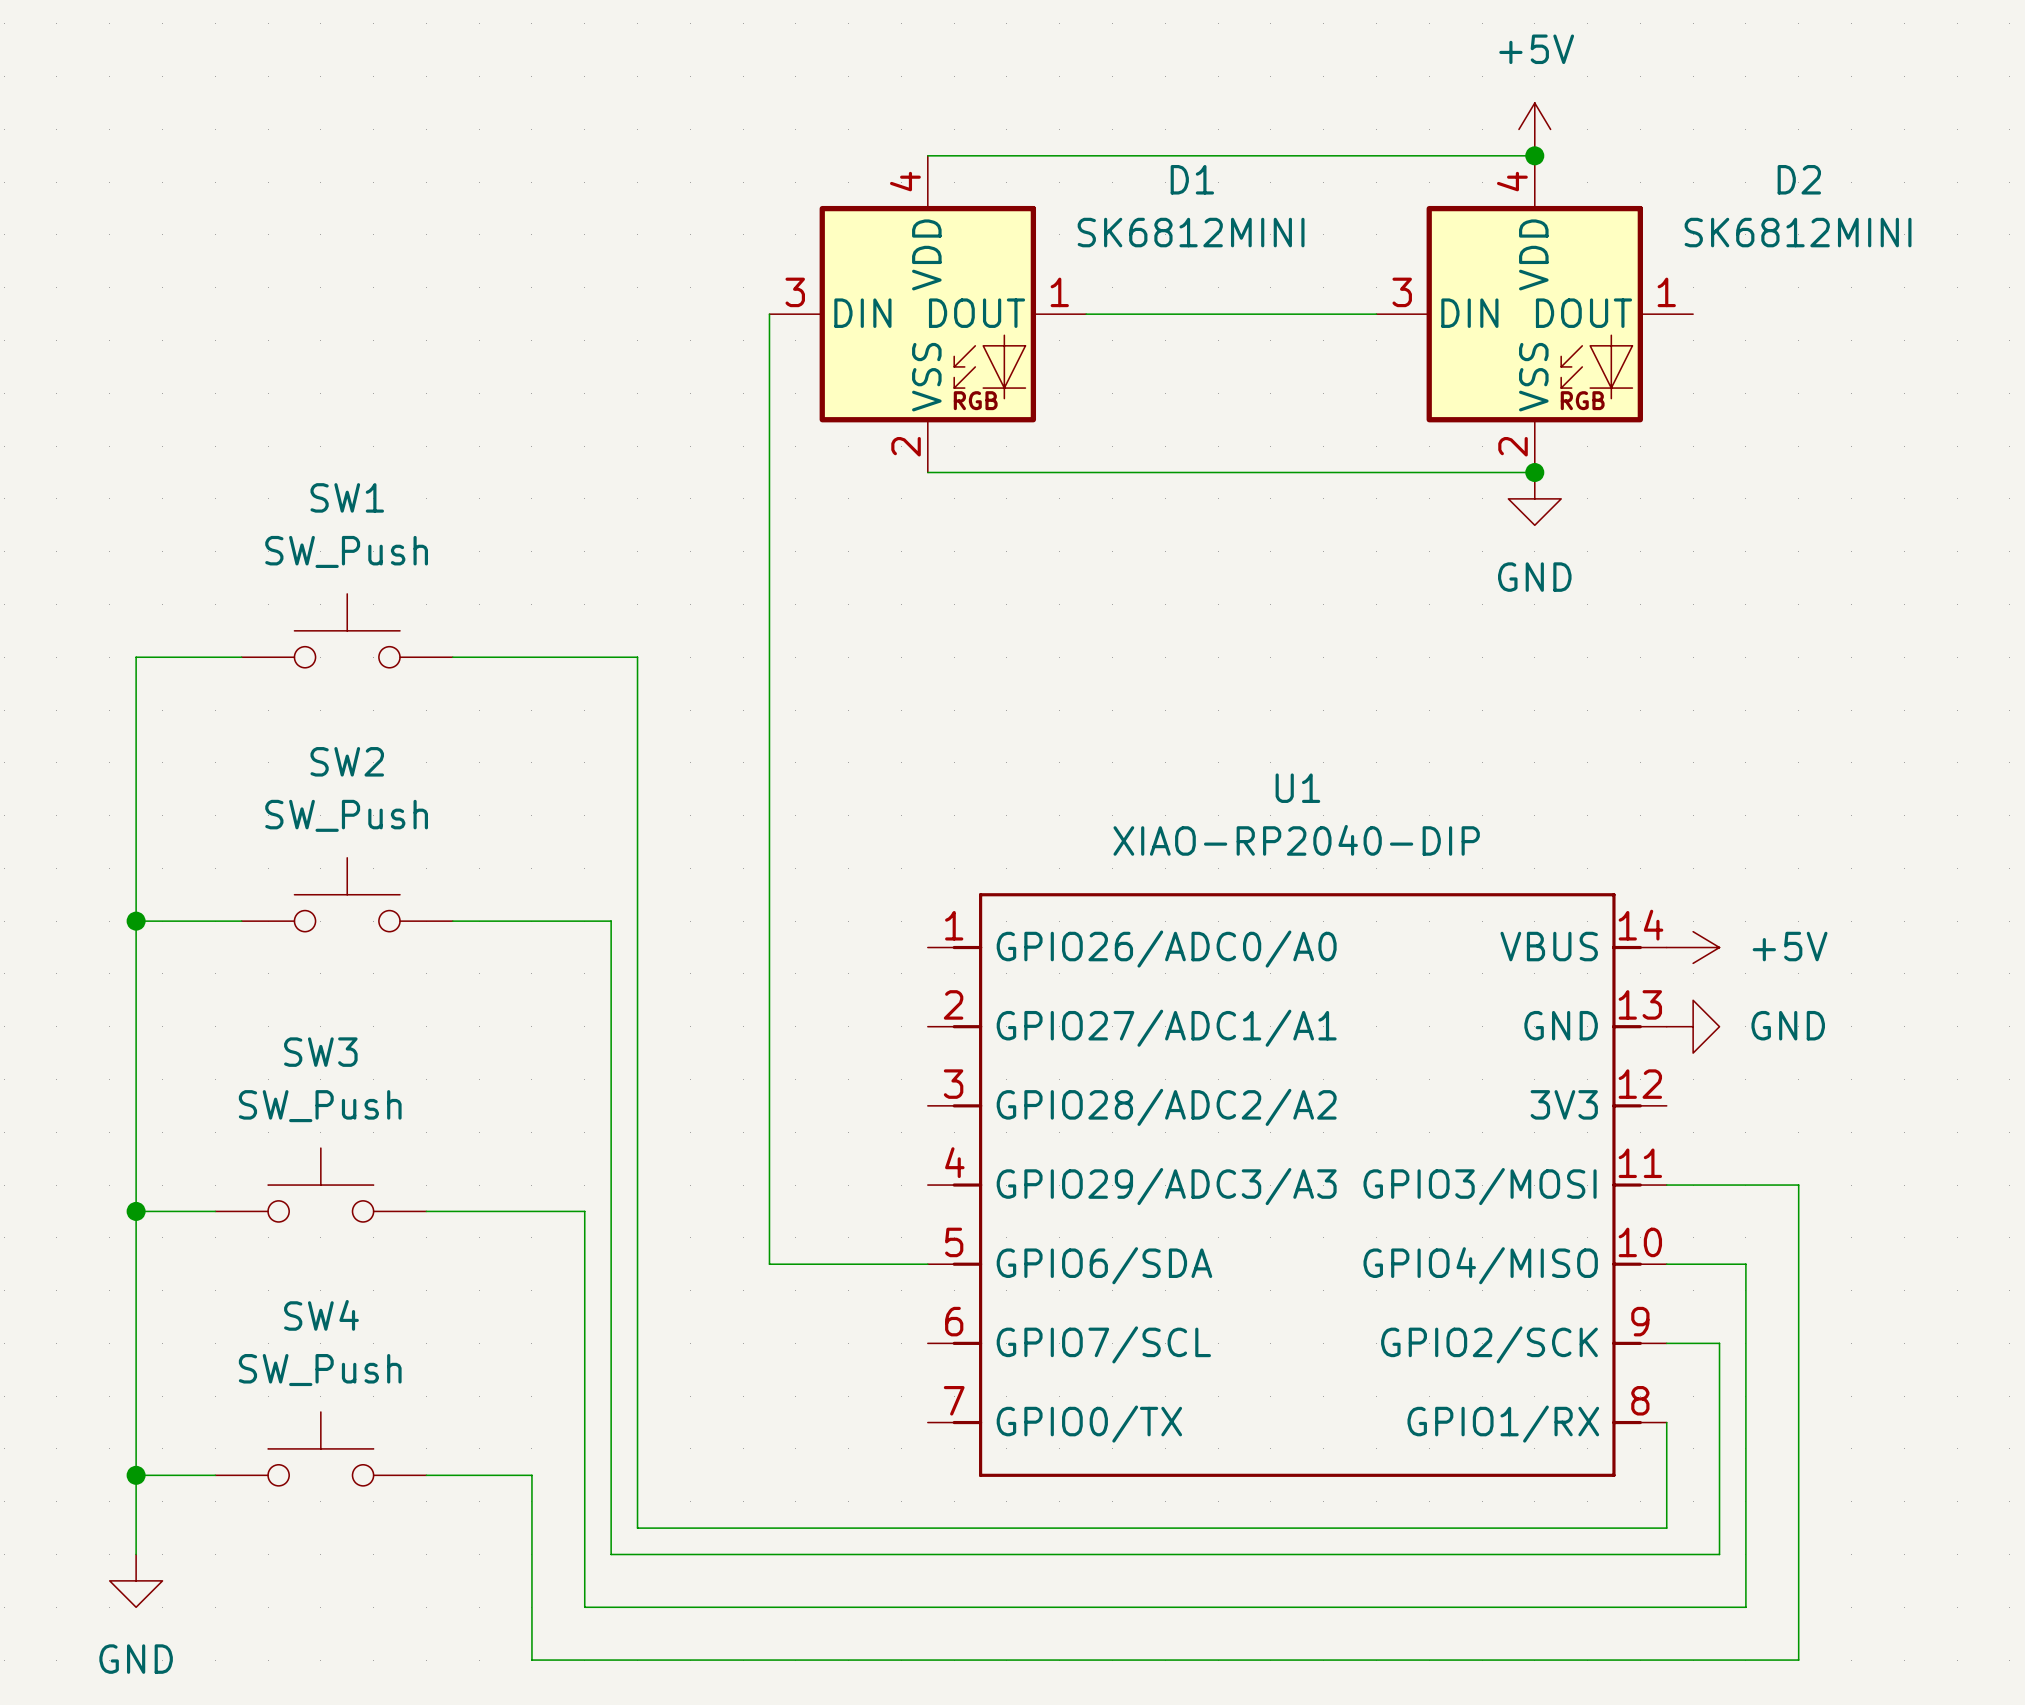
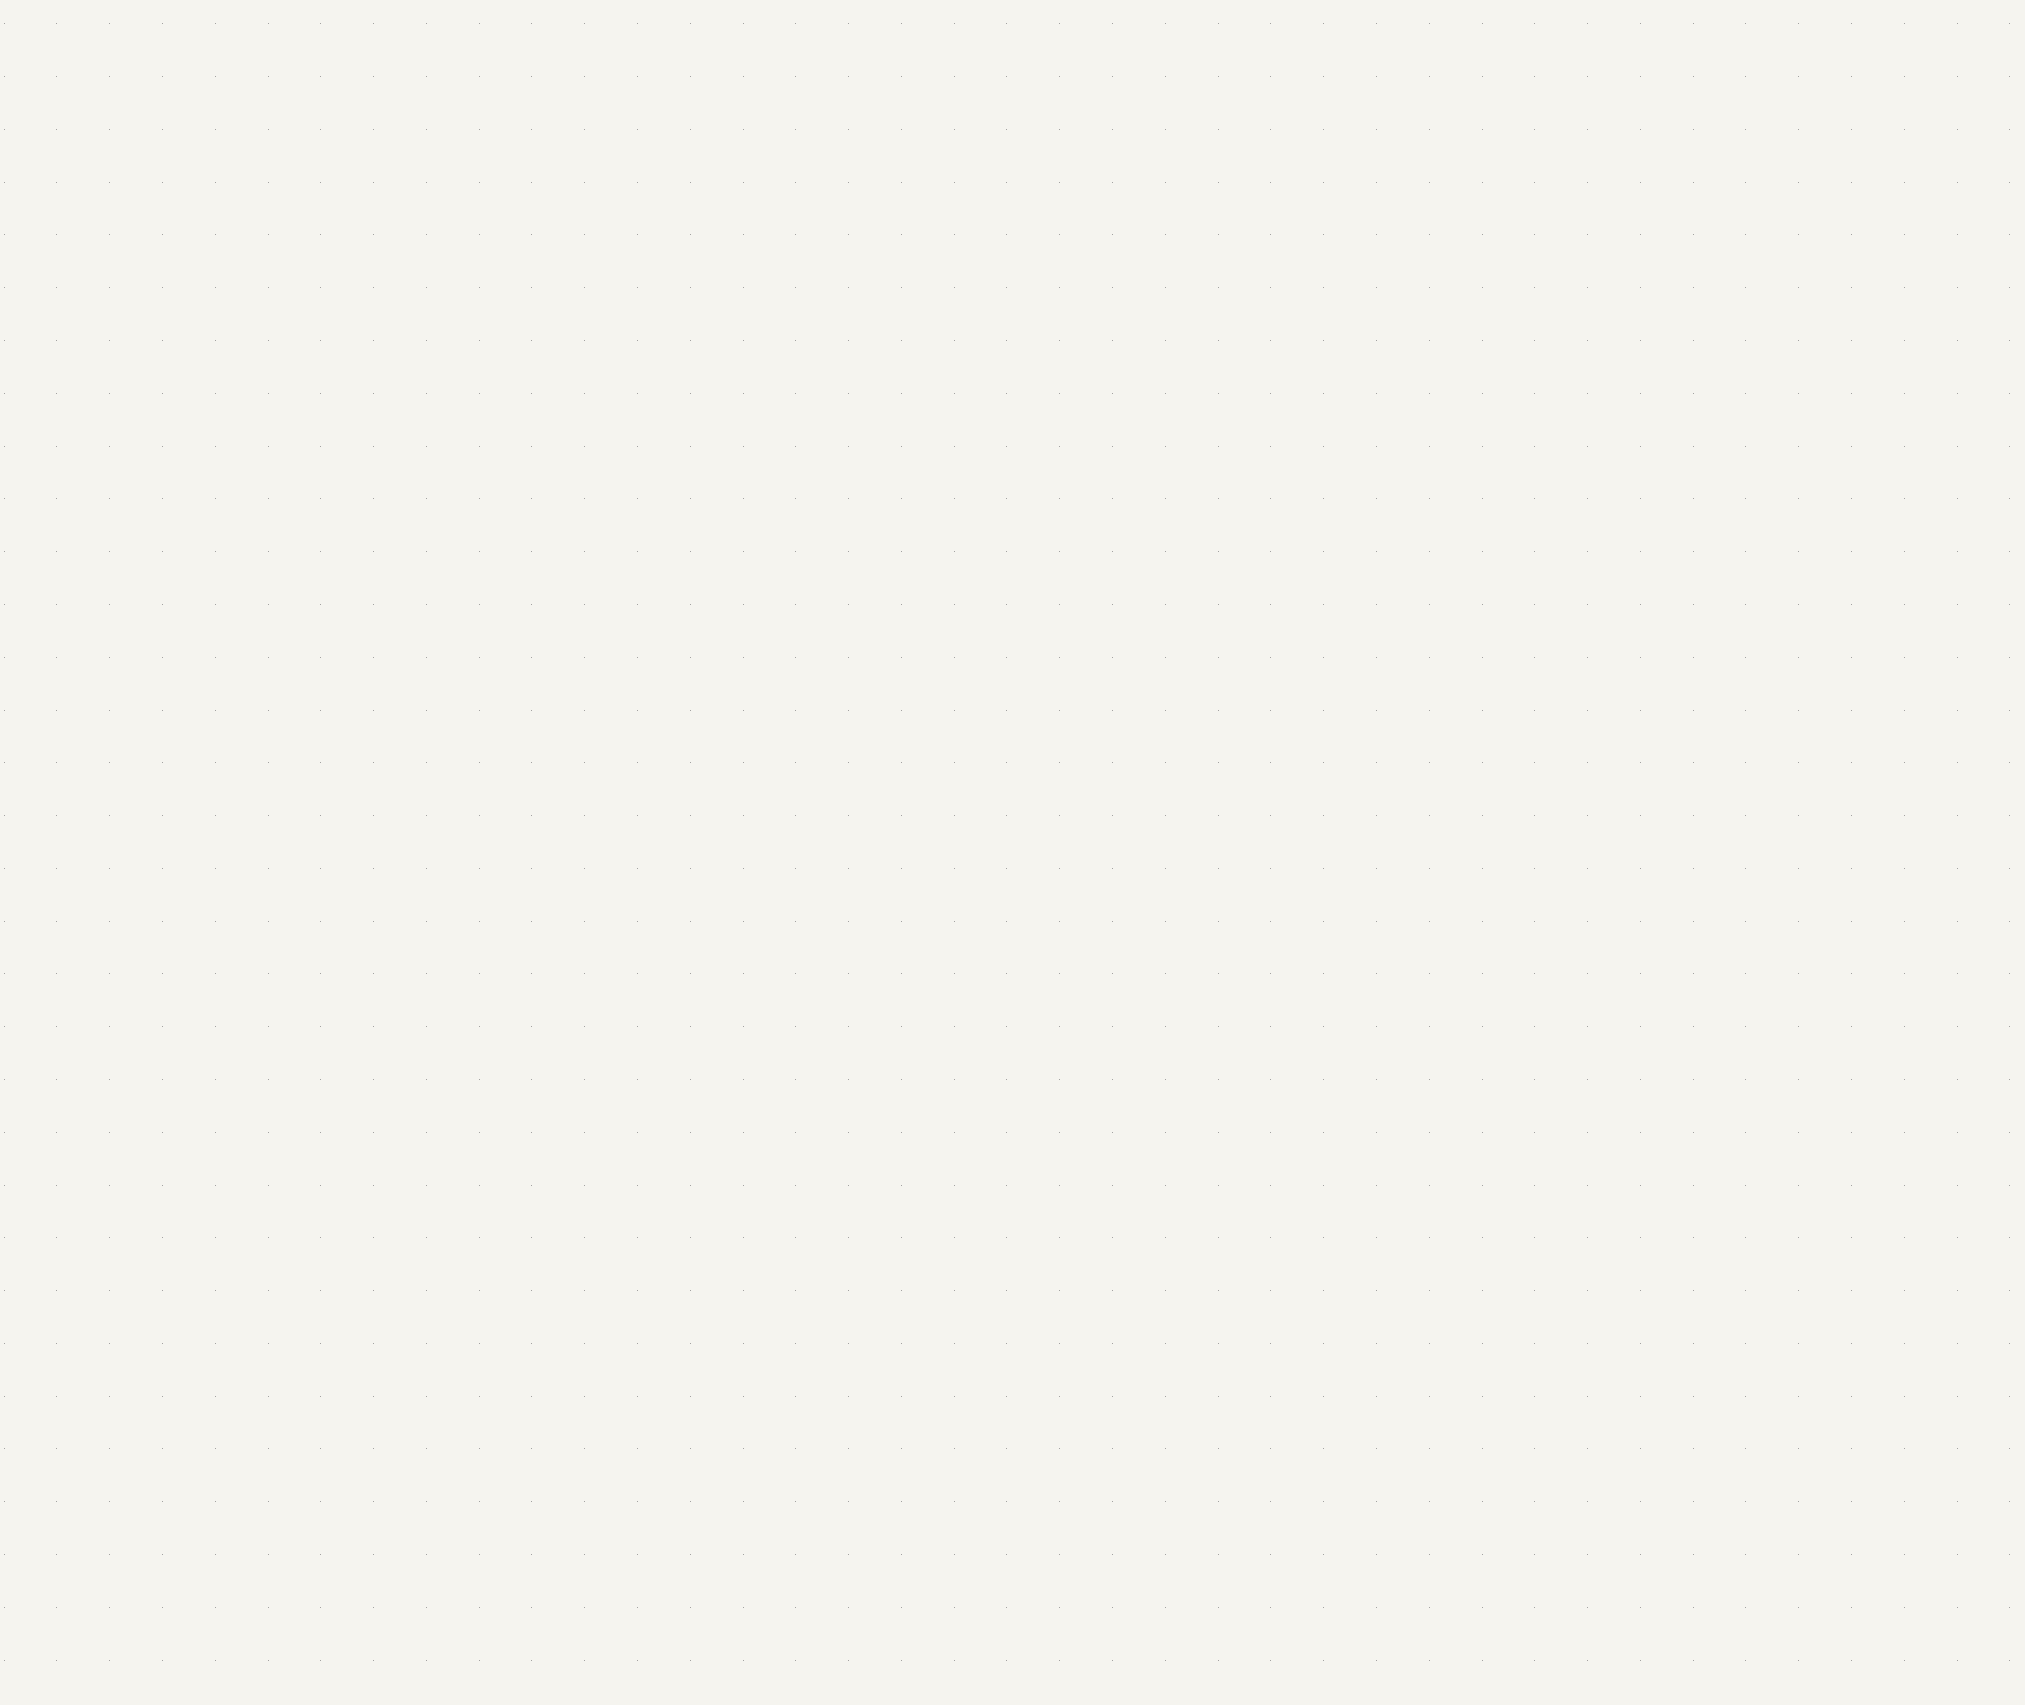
power symbol: +5V (1534, 129) -> none
wire: (927, 155) (1534, 155) -> none
junction: (1534, 155) -> none
wire: (769, 314) (769, 1264) (927, 1264) -> none
D1: SK6812MINI (927, 314) -> none
wire: (1086, 314) (1376, 314) -> none
D2: SK6812MINI (1534, 314) -> none
wire: (927, 472) (1534, 472) -> none
junction: (1534, 472) -> none
power symbol: GND (1534, 498) -> none
SW1: SW_Push (347, 630) -> none
wire: (241, 657) (136, 657) (136, 1554) -> none
wire: (452, 657) (637, 657) (637, 1528) (1666, 1528) (1666, 1422) -> none
SW2: SW_Push (347, 894) -> none
wire: (136, 921) (241, 921) -> none
junction: (136, 921) -> none
wire: (452, 921) (611, 921) (611, 1554) (1719, 1554) (1719, 1343) (1666, 1343) -> none
power symbol: +5V (1693, 947) -> none
power symbol: GND (1693, 1026) -> none
SW3: SW_Push (320, 1185) -> none
U1: XIAO-RP2040-DIP (1297, 1185) -> none
wire: (1666, 1185) (1798, 1185) (1798, 1660) (531, 1660) (531, 1475) (426, 1475) -> none
wire: (136, 1211) (215, 1211) -> none
junction: (136, 1211) -> none
wire: (426, 1211) (584, 1211) (584, 1607) (1745, 1607) (1745, 1264) (1666, 1264) -> none
SW4: SW_Push (320, 1448) -> none
wire: (136, 1475) (215, 1475) -> none
junction: (136, 1475) -> none
power symbol: GND (136, 1580) -> none

